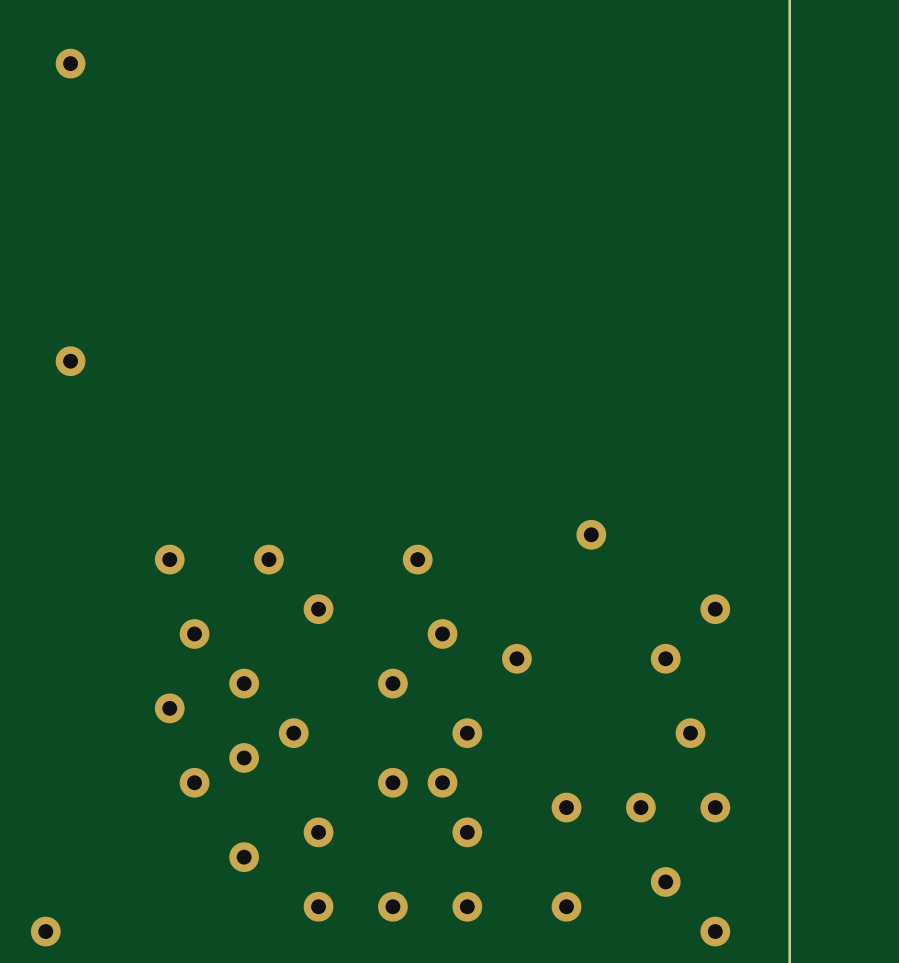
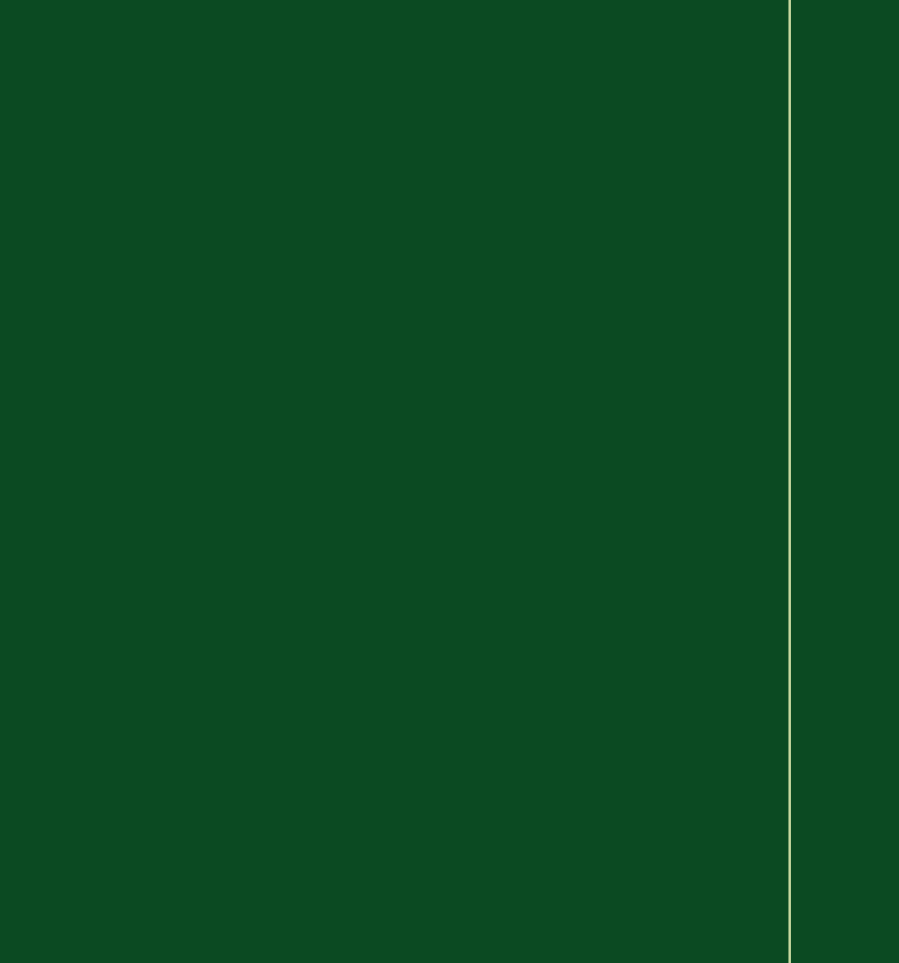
via: (70, 63) -> none
via: (70, 361) -> none
via: (591, 534) -> none
via: (169, 559) -> none
via: (268, 559) -> none
via: (417, 559) -> none
via: (318, 609) -> none
via: (715, 609) -> none
via: (194, 633) -> none
via: (442, 633) -> none
via: (516, 658) -> none
via: (665, 658) -> none
via: (244, 683) -> none
via: (392, 683) -> none
via: (169, 708) -> none
via: (293, 733) -> none
via: (467, 733) -> none
via: (690, 733) -> none
via: (244, 757) -> none
via: (194, 782) -> none
via: (392, 782) -> none
via: (442, 782) -> none
via: (566, 807) -> none
via: (640, 807) -> none
via: (715, 807) -> none
via: (318, 832) -> none
via: (467, 832) -> none
via: (244, 857) -> none
via: (665, 881) -> none
via: (318, 906) -> none
via: (392, 906) -> none
via: (467, 906) -> none
via: (566, 906) -> none
via: (45, 931) -> none
via: (715, 931) -> none

